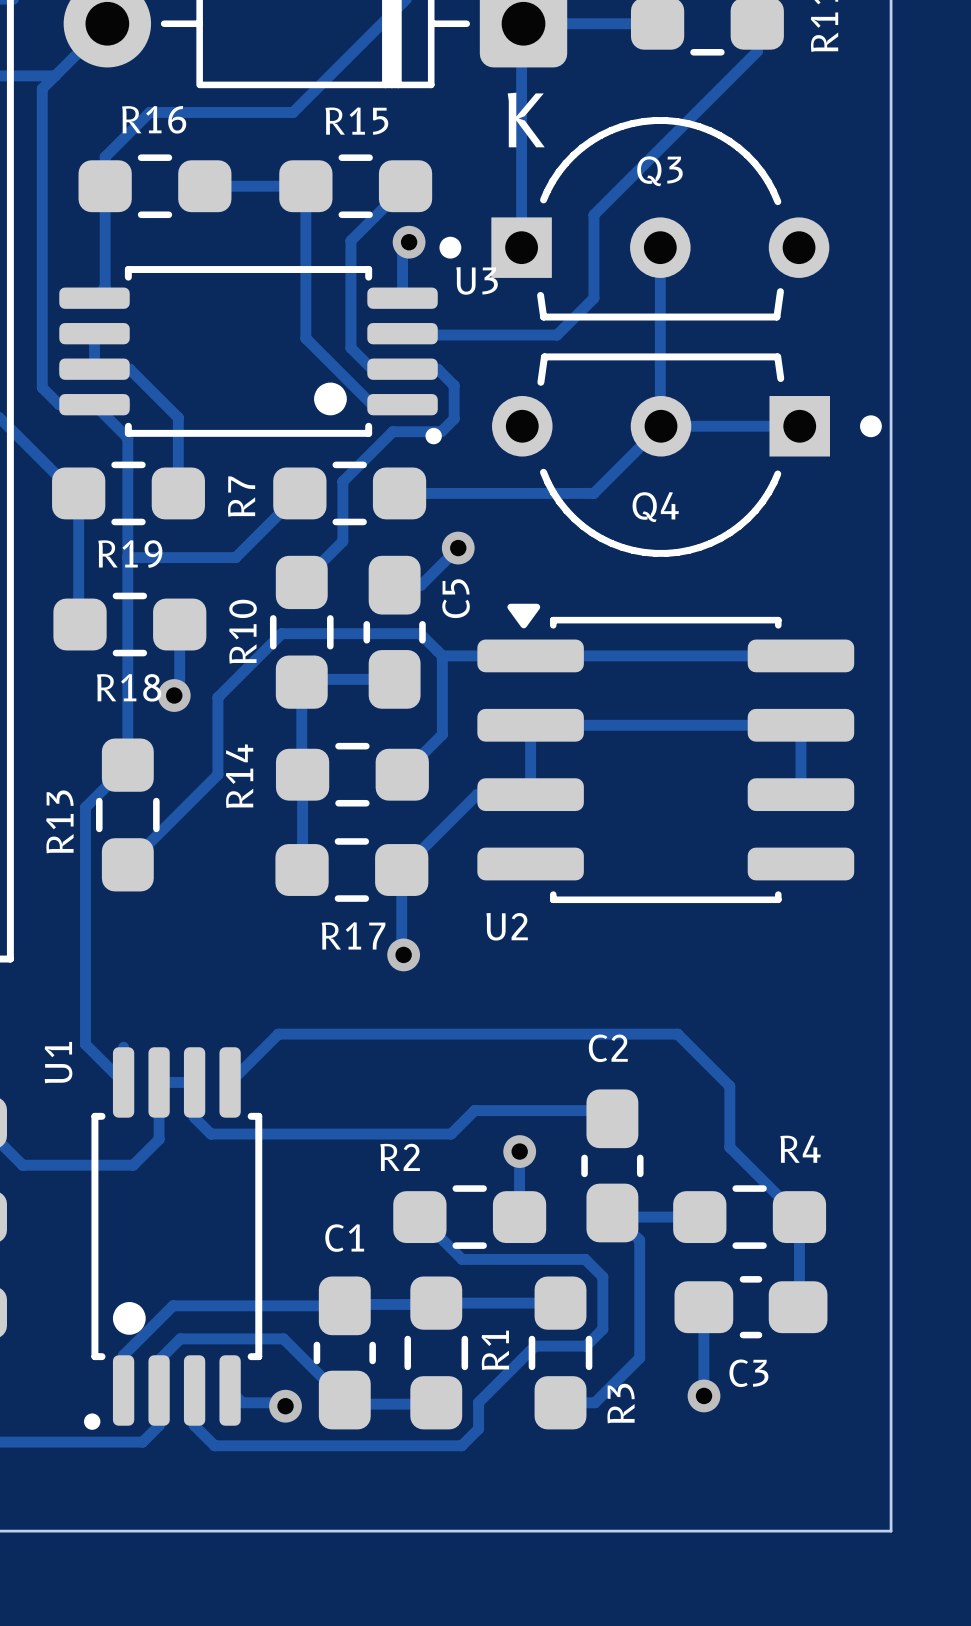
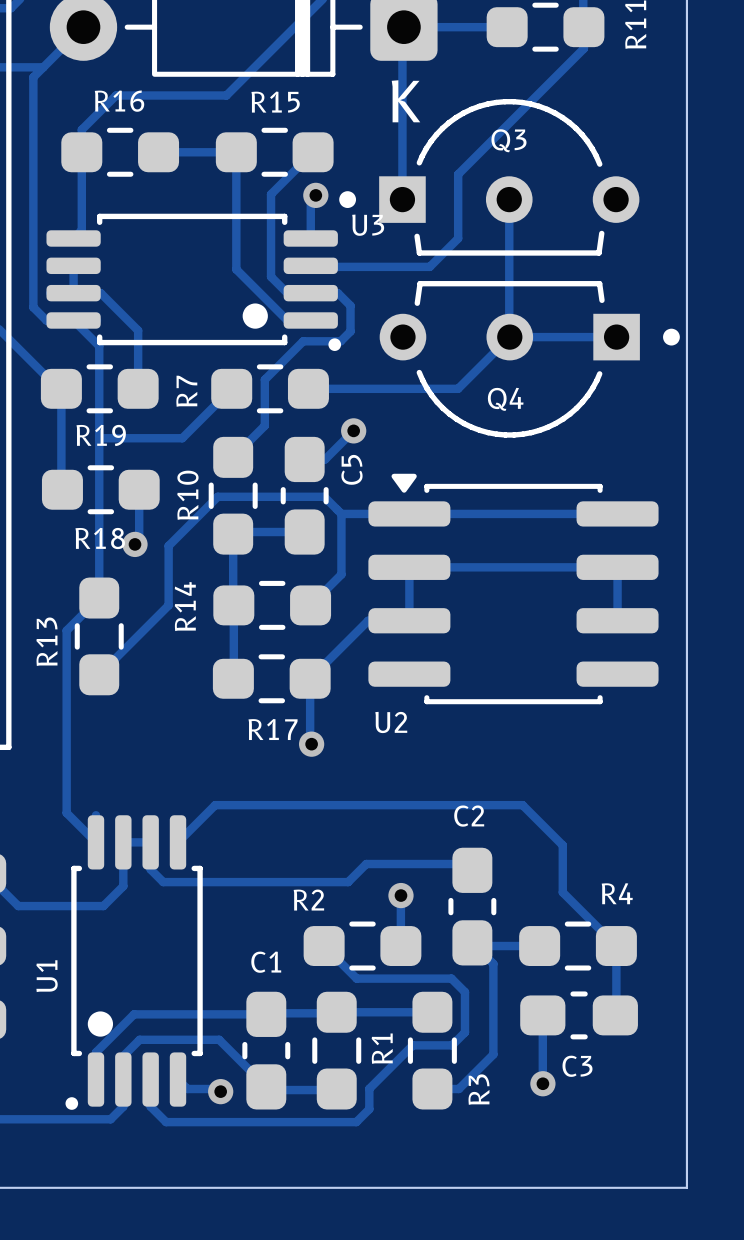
U1 name position: U1 (58, 1062) -> U1 (47, 976)

